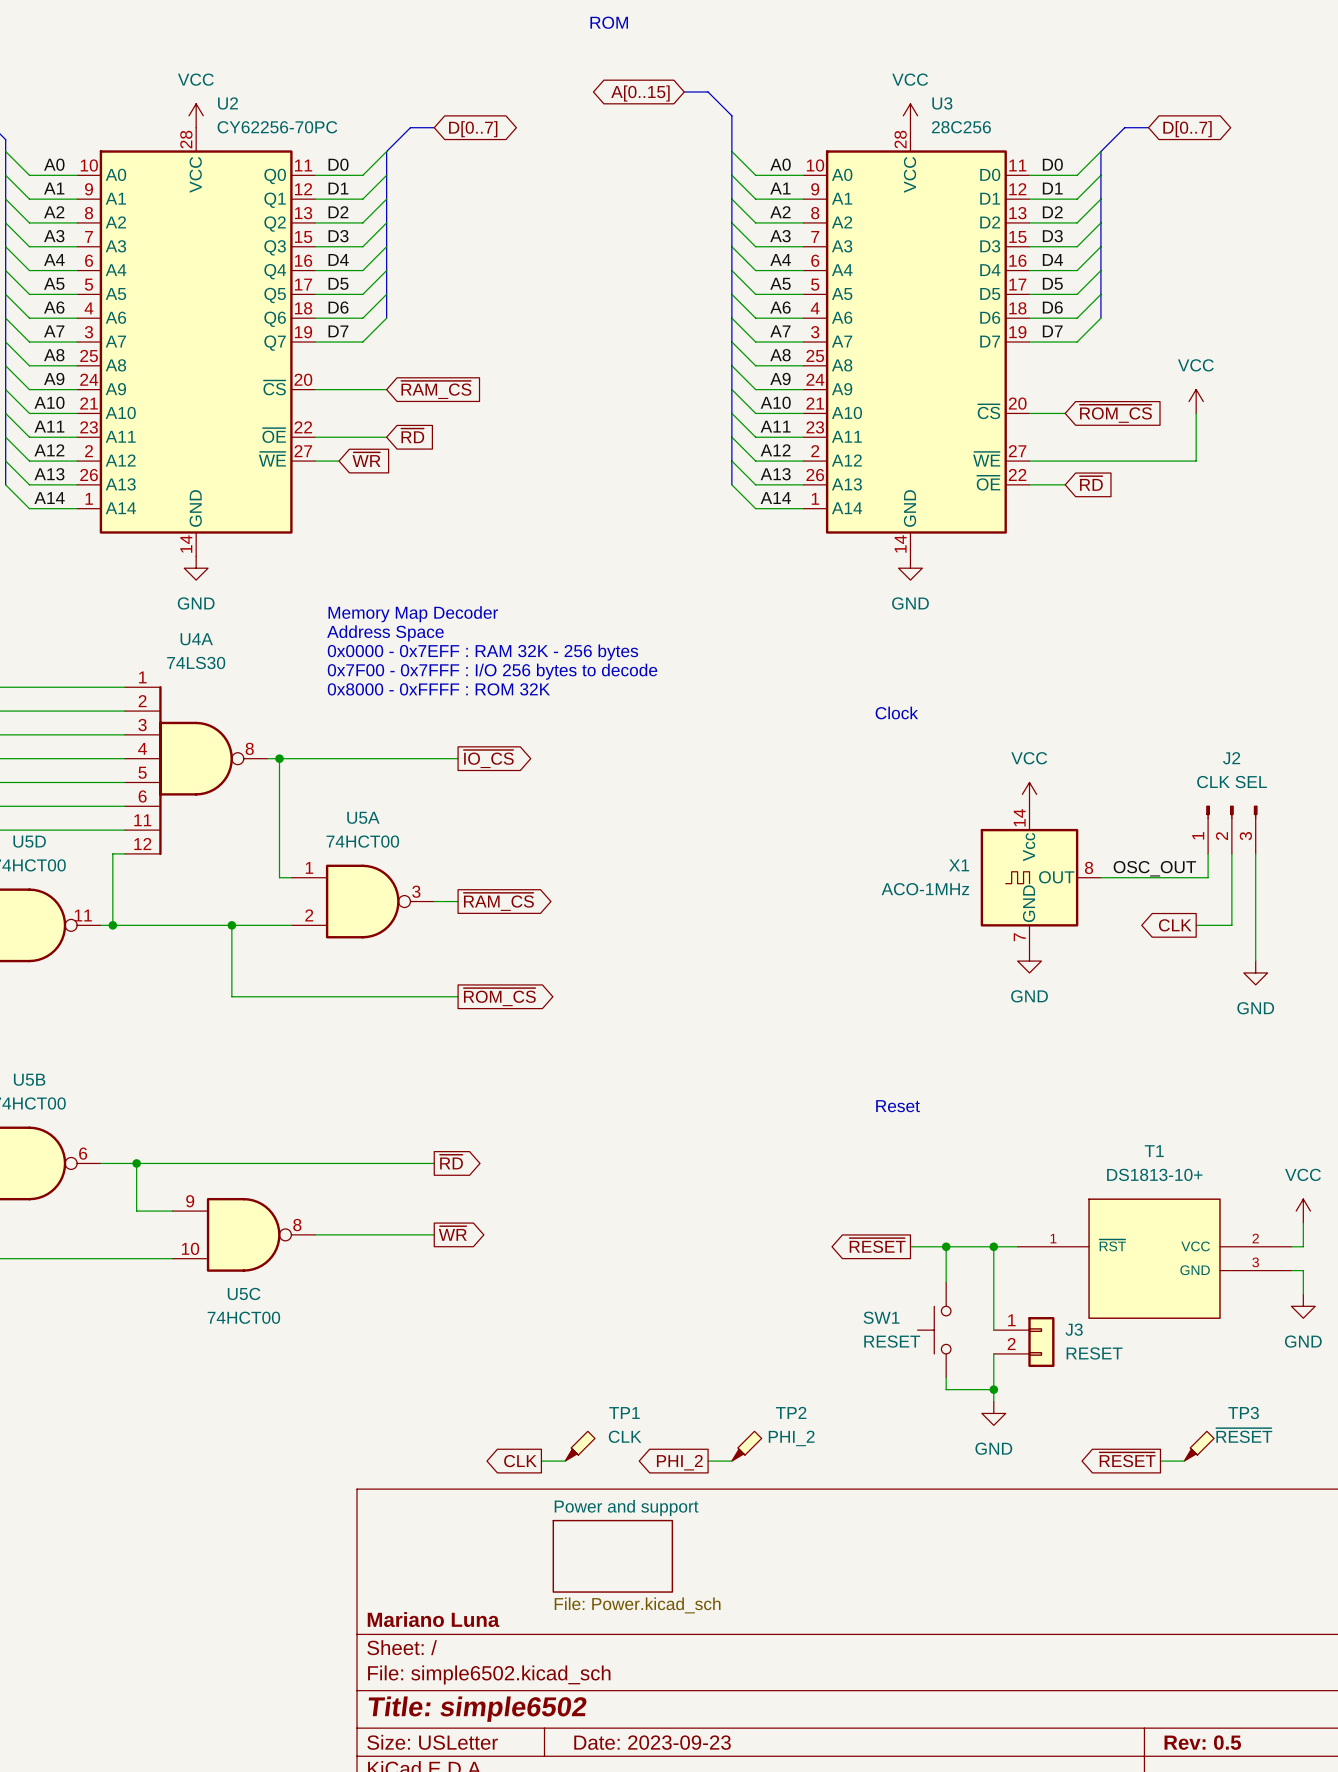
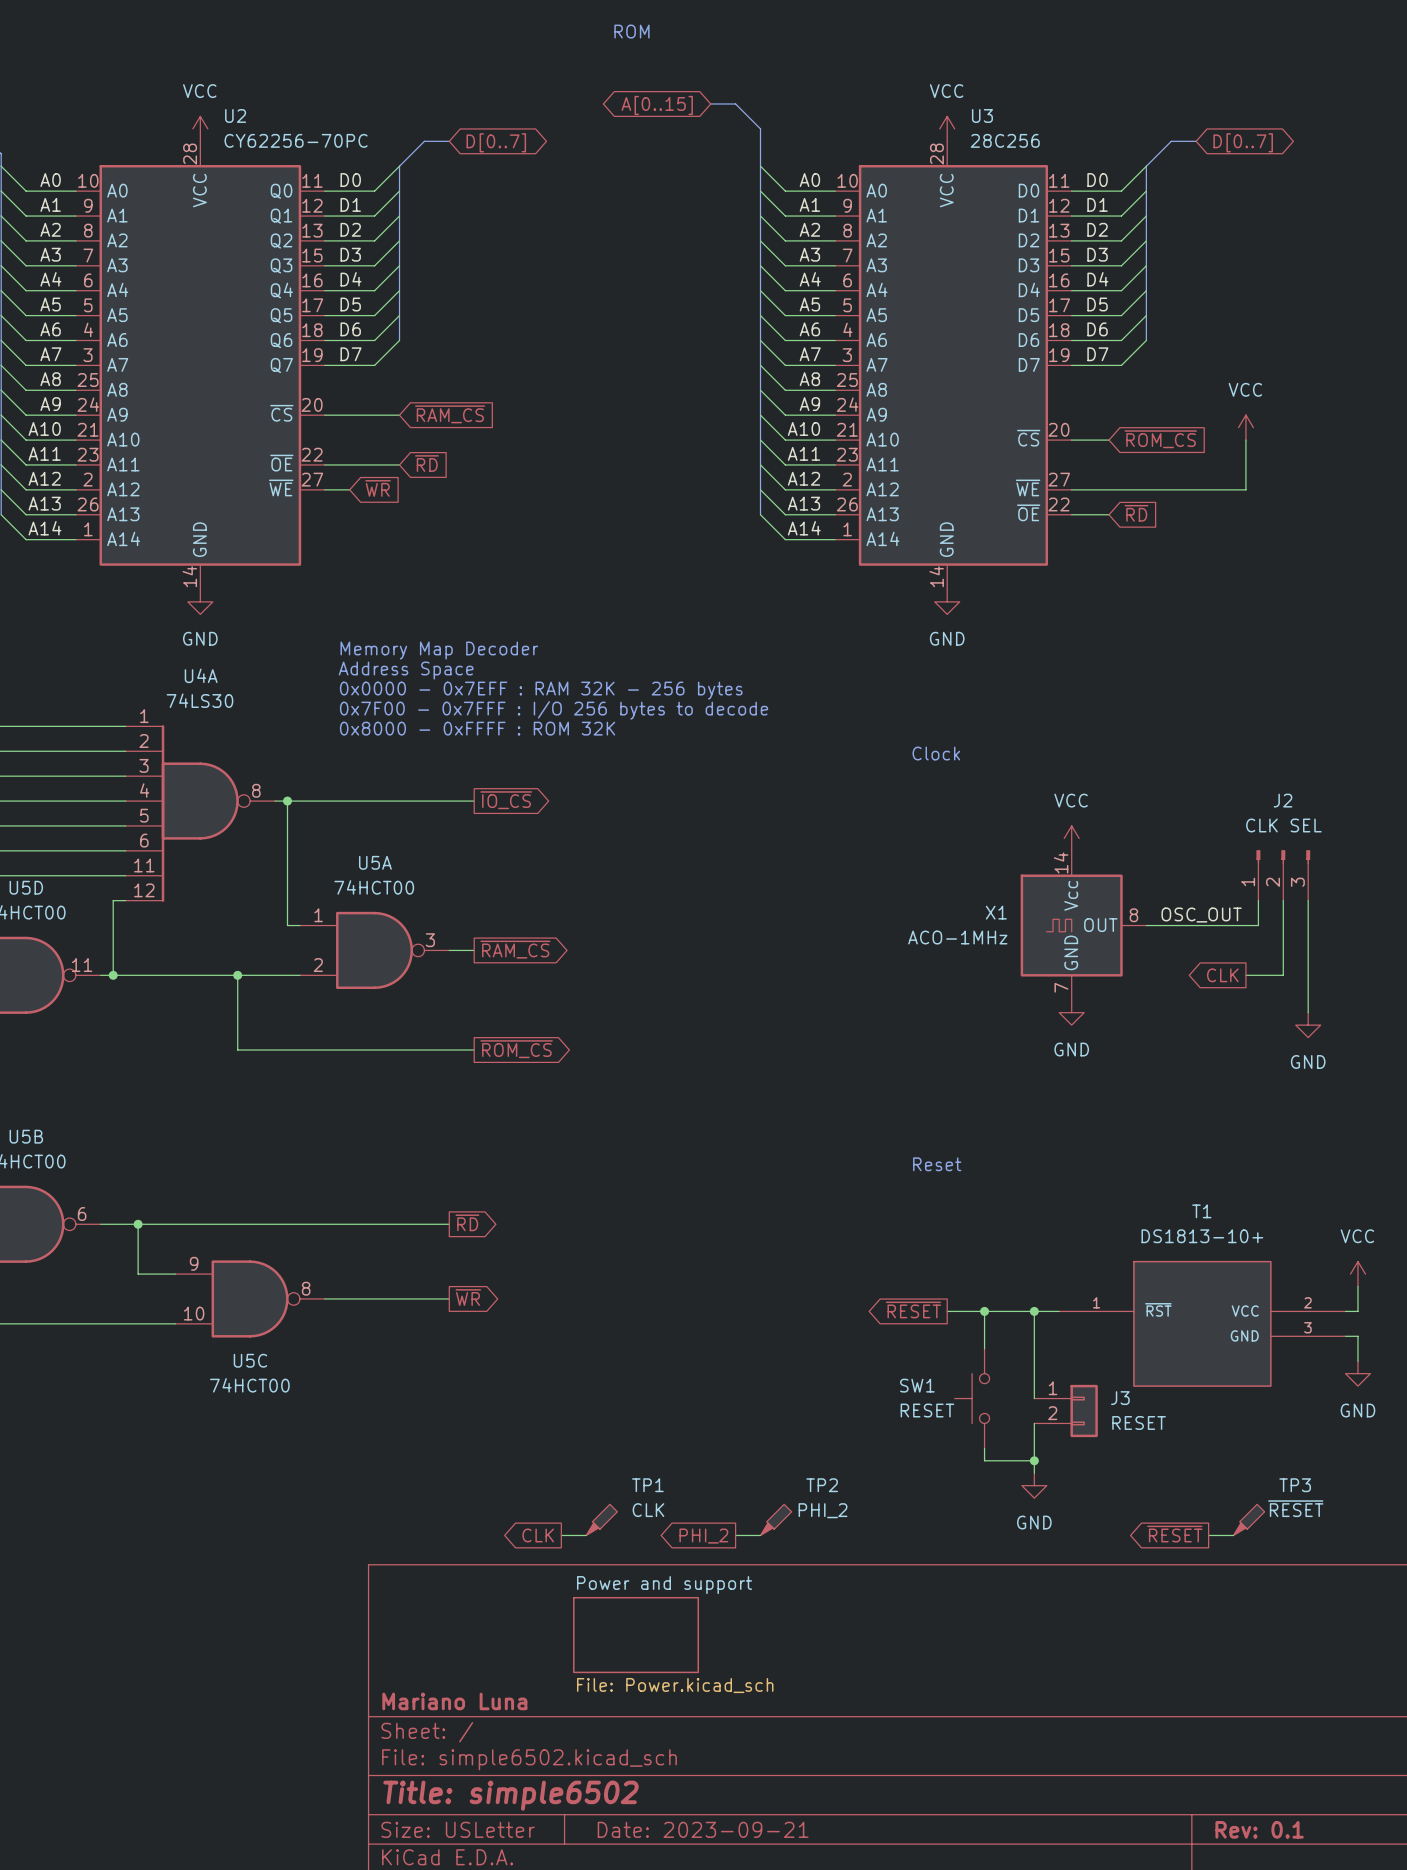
title block: Date: 2023-09-23 (652, 1742) -> Date: 2023-09-21 (703, 1829)
title block: Rev: 0.5 (1202, 1742) -> Rev: 0.1 (1259, 1829)

